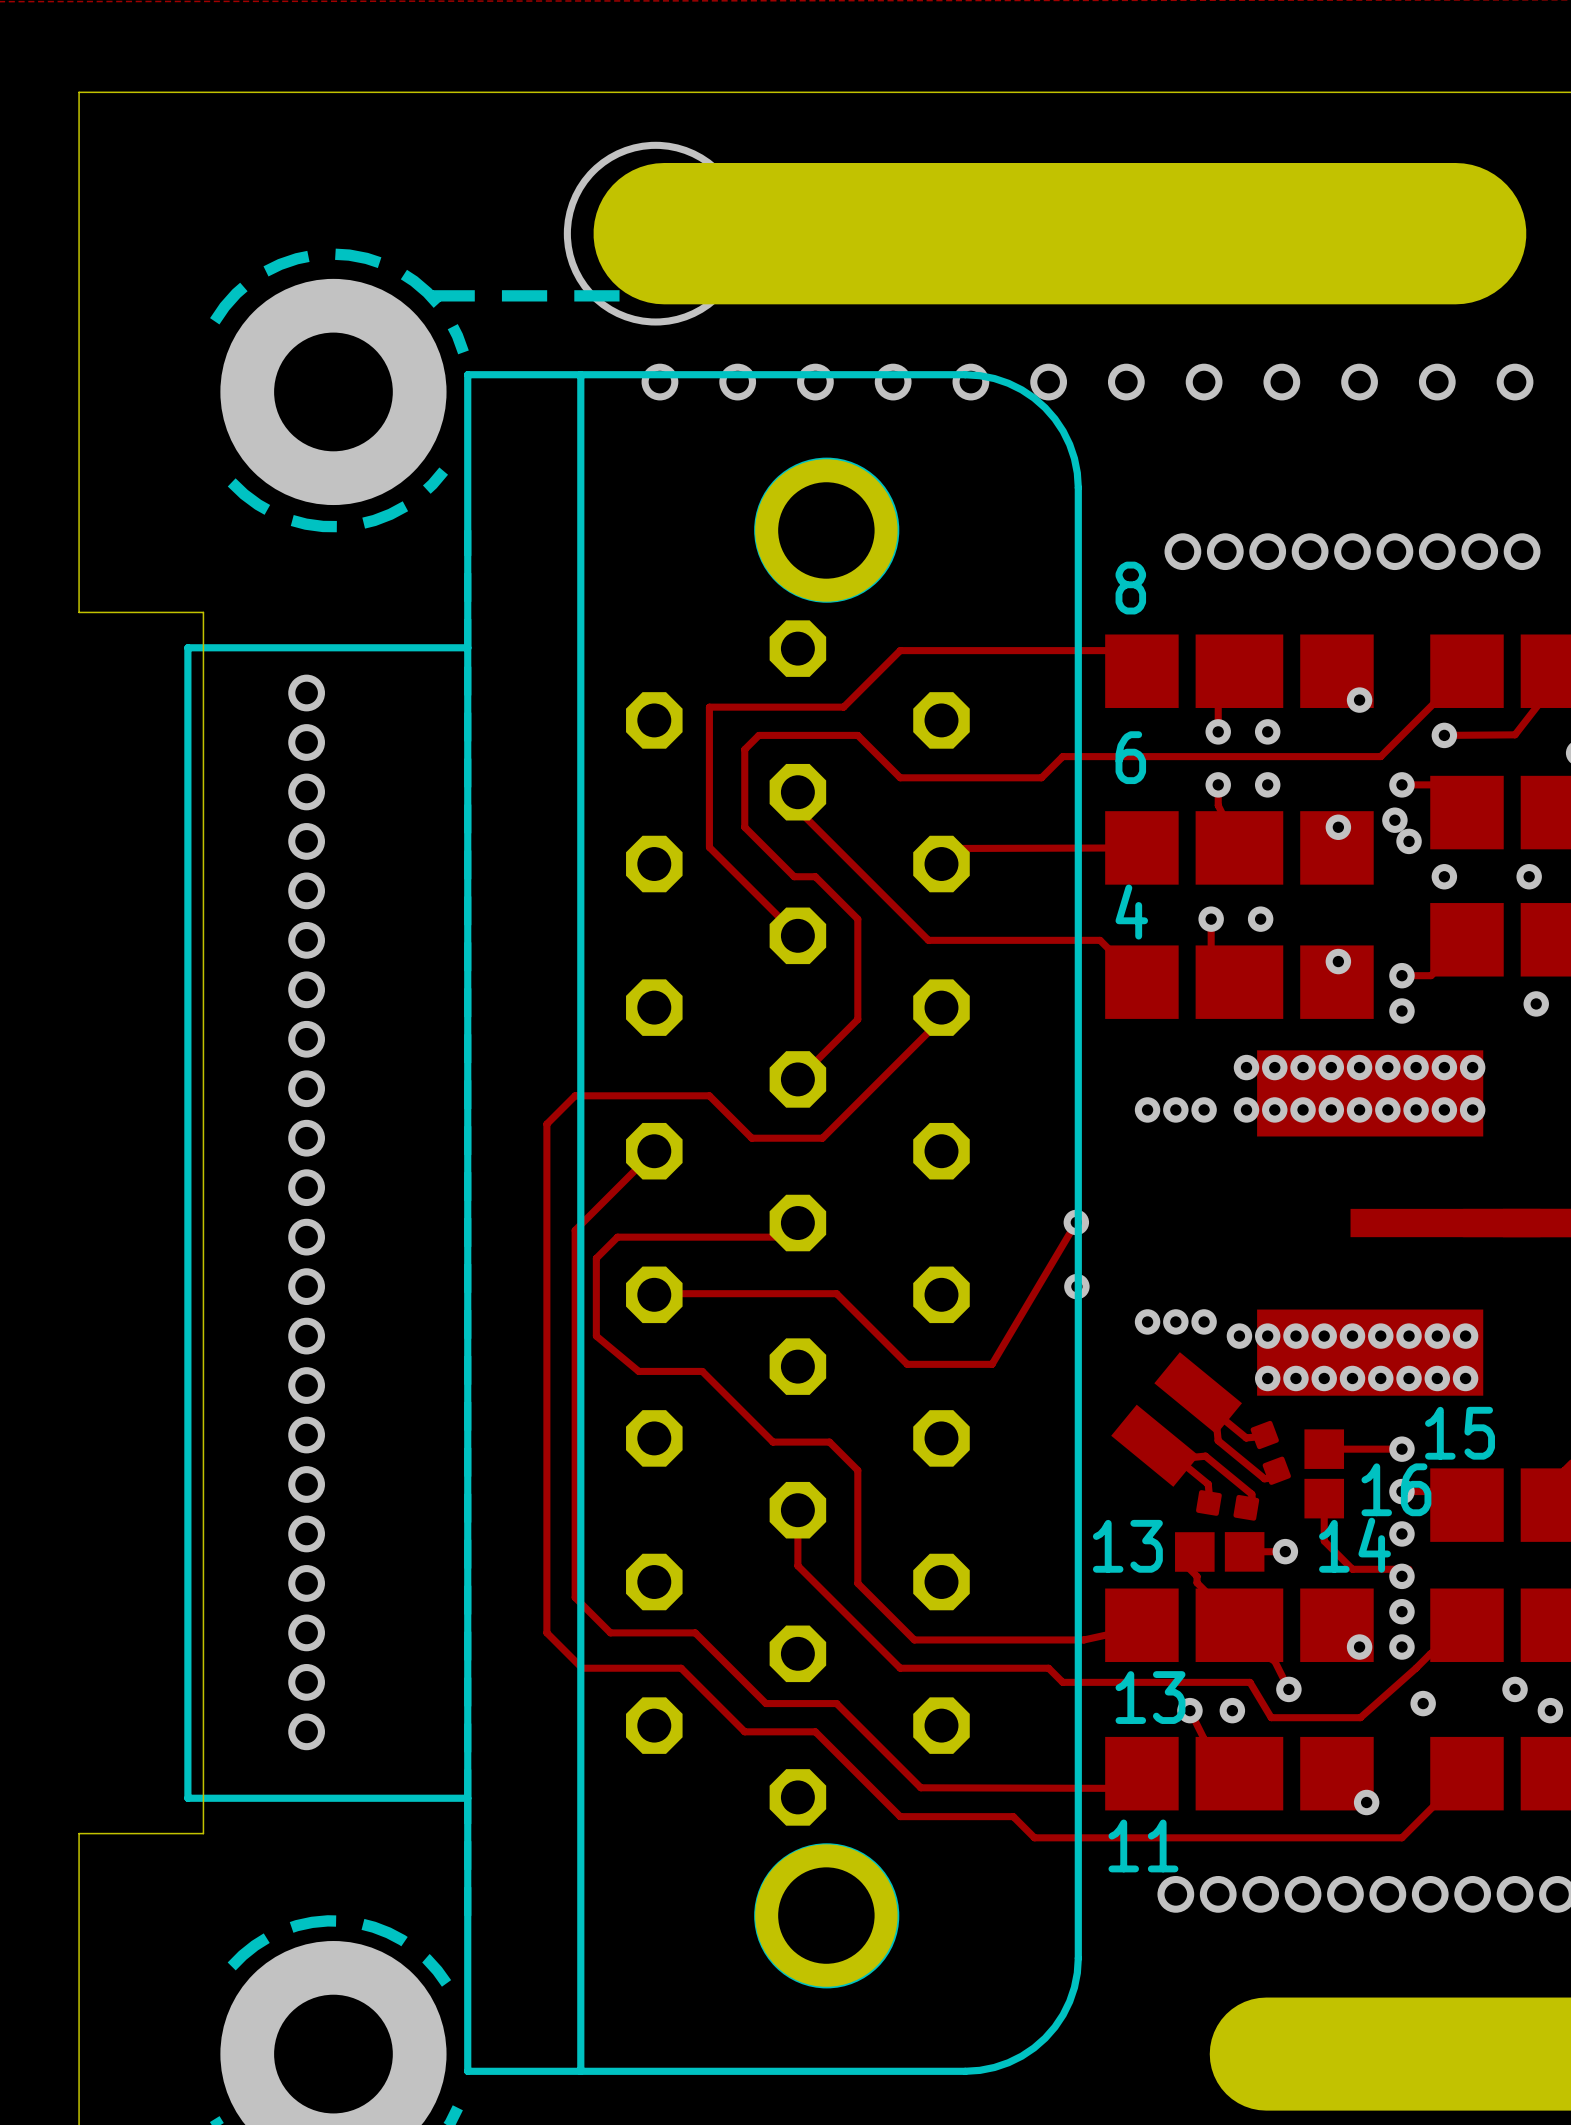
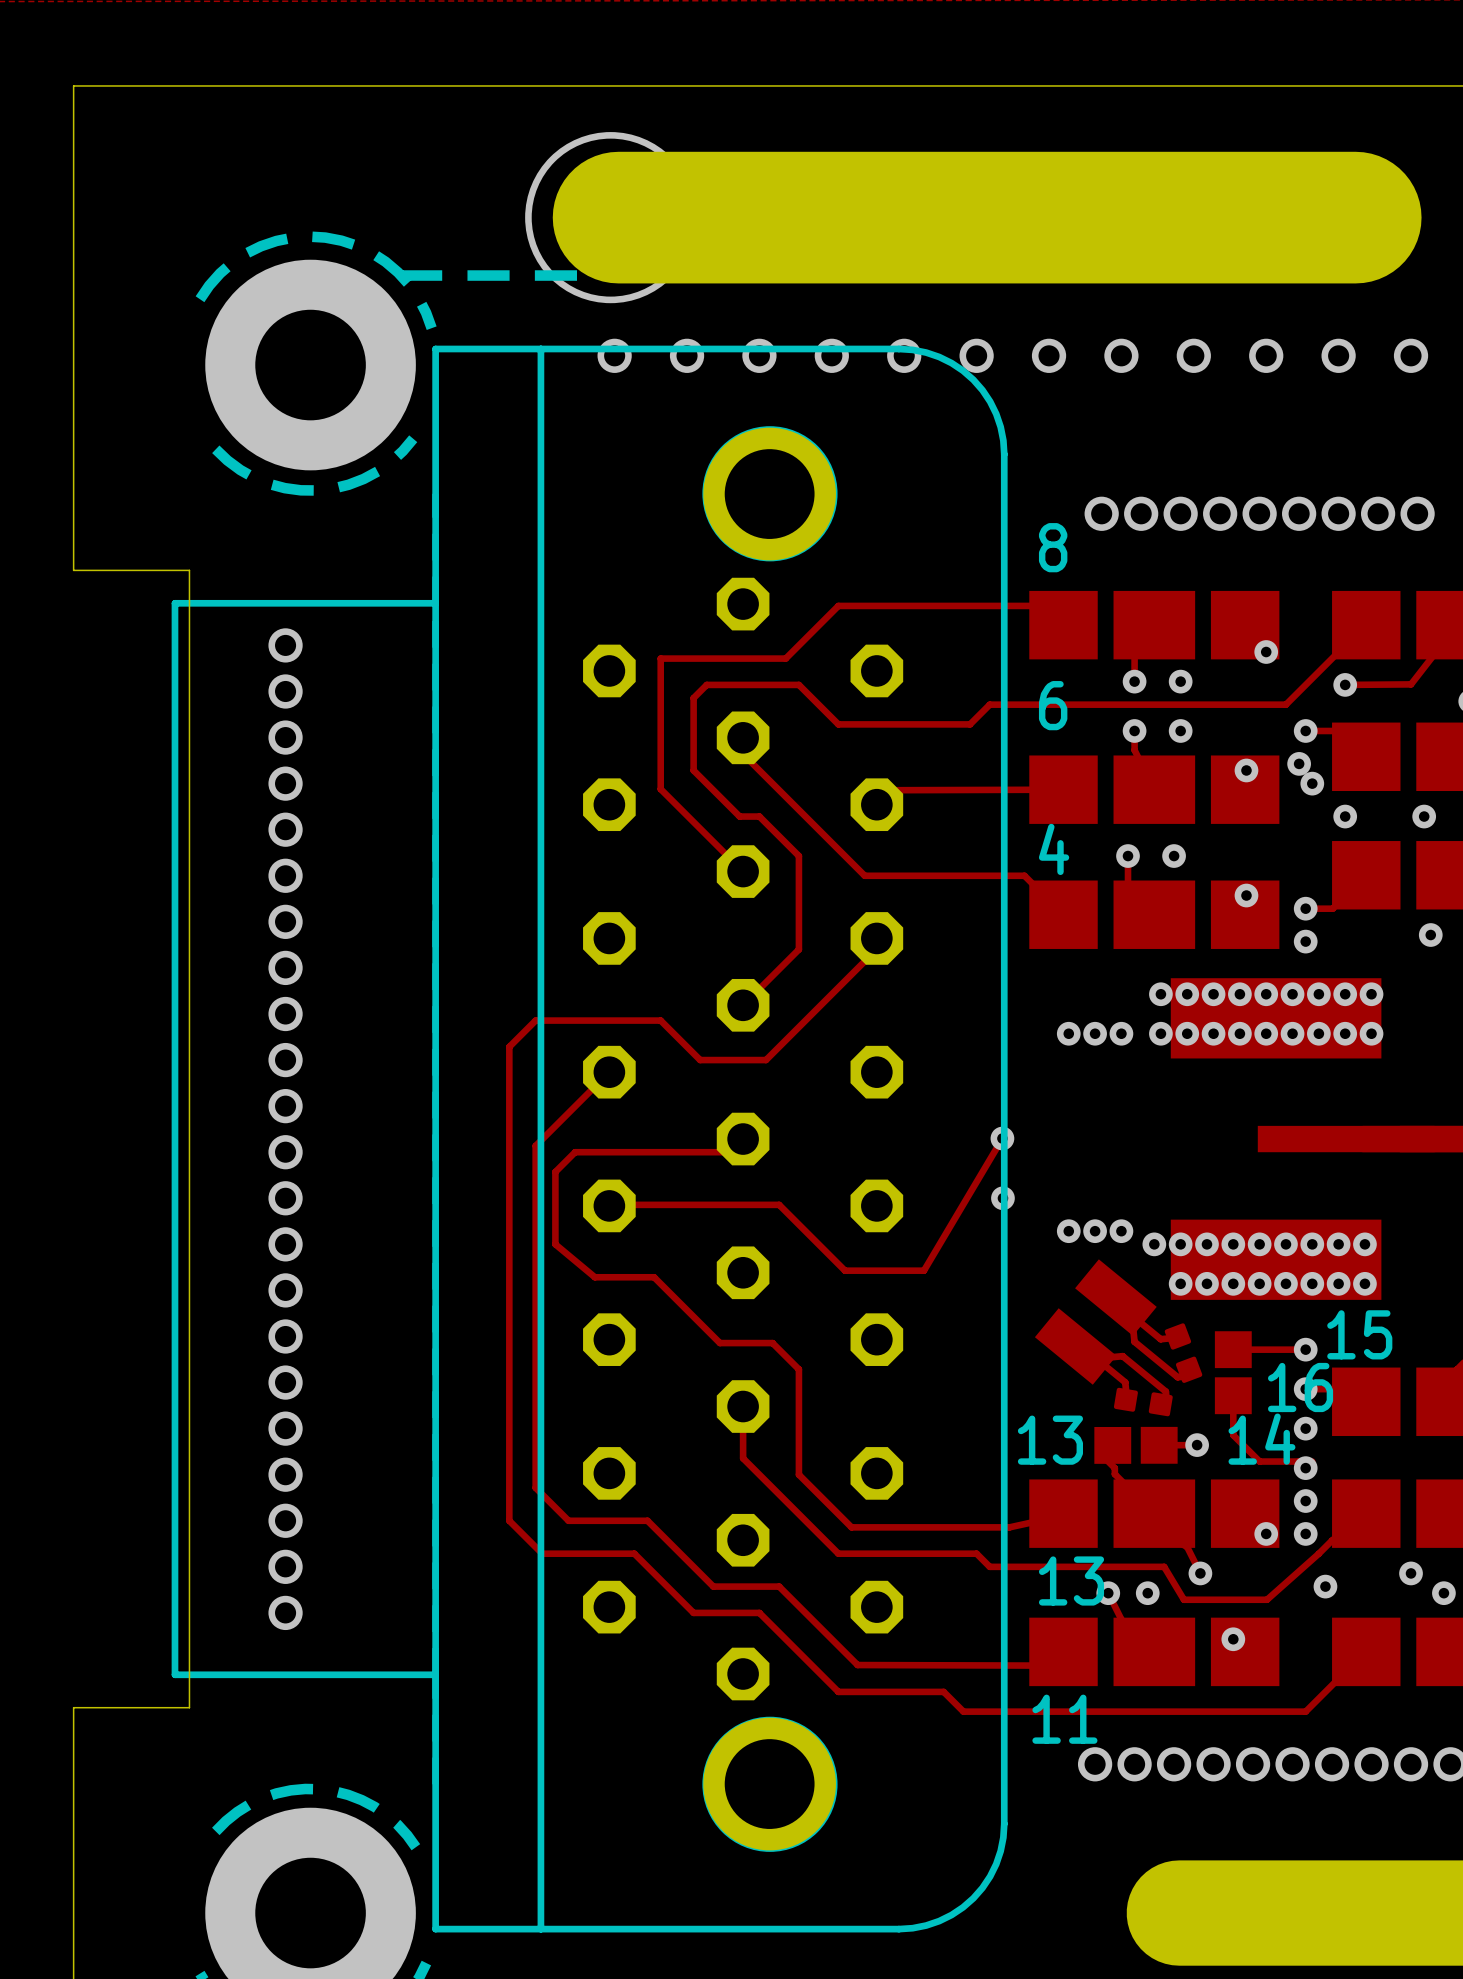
via position: (1366, 1802) -> (1233, 1639)

